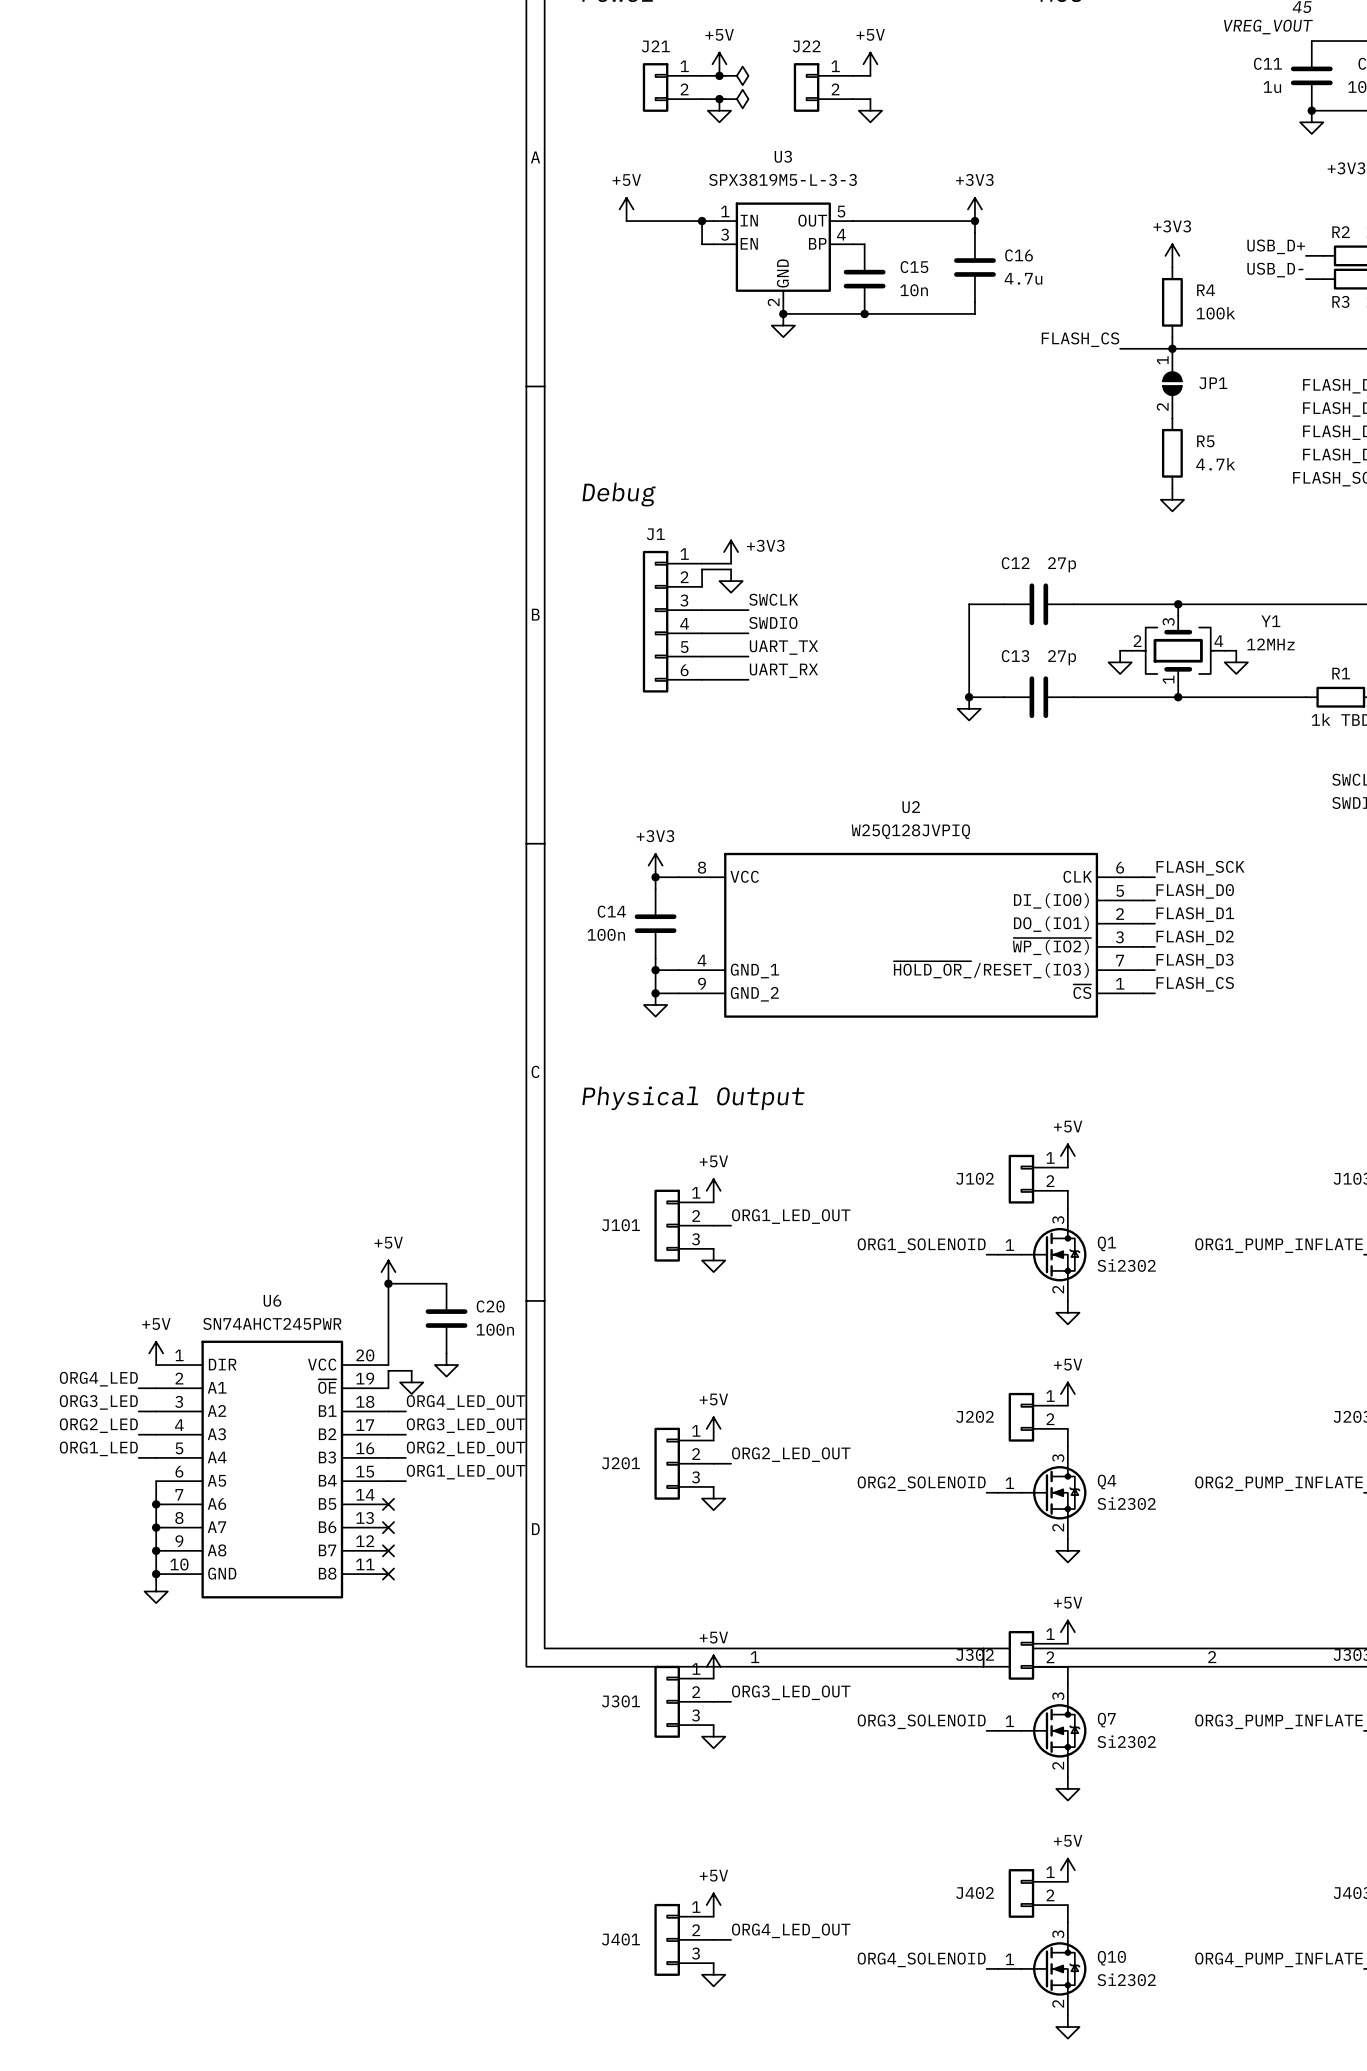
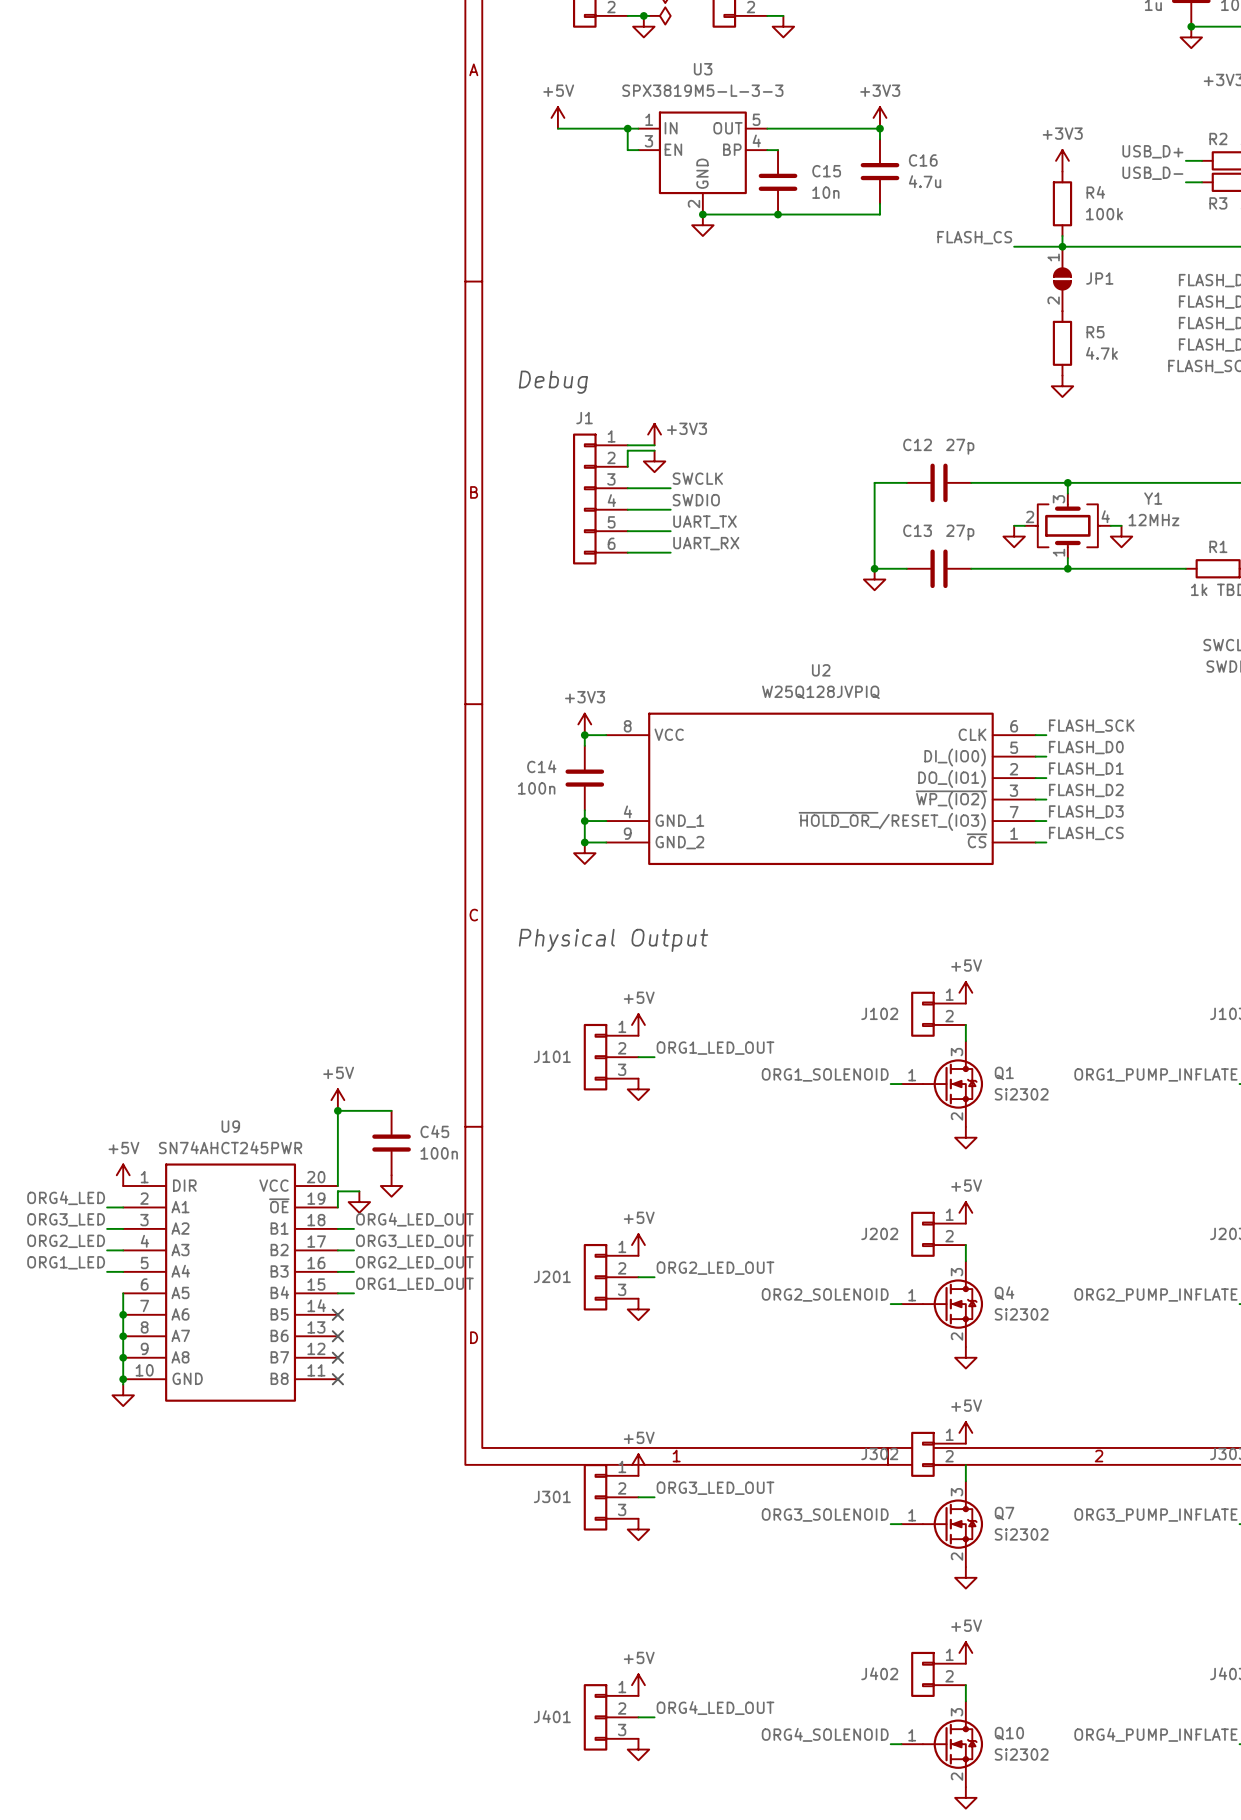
U6 name: U6 (272, 1300) -> U9 (230, 1126)
C20 name: C20 (490, 1306) -> C45 (434, 1131)

